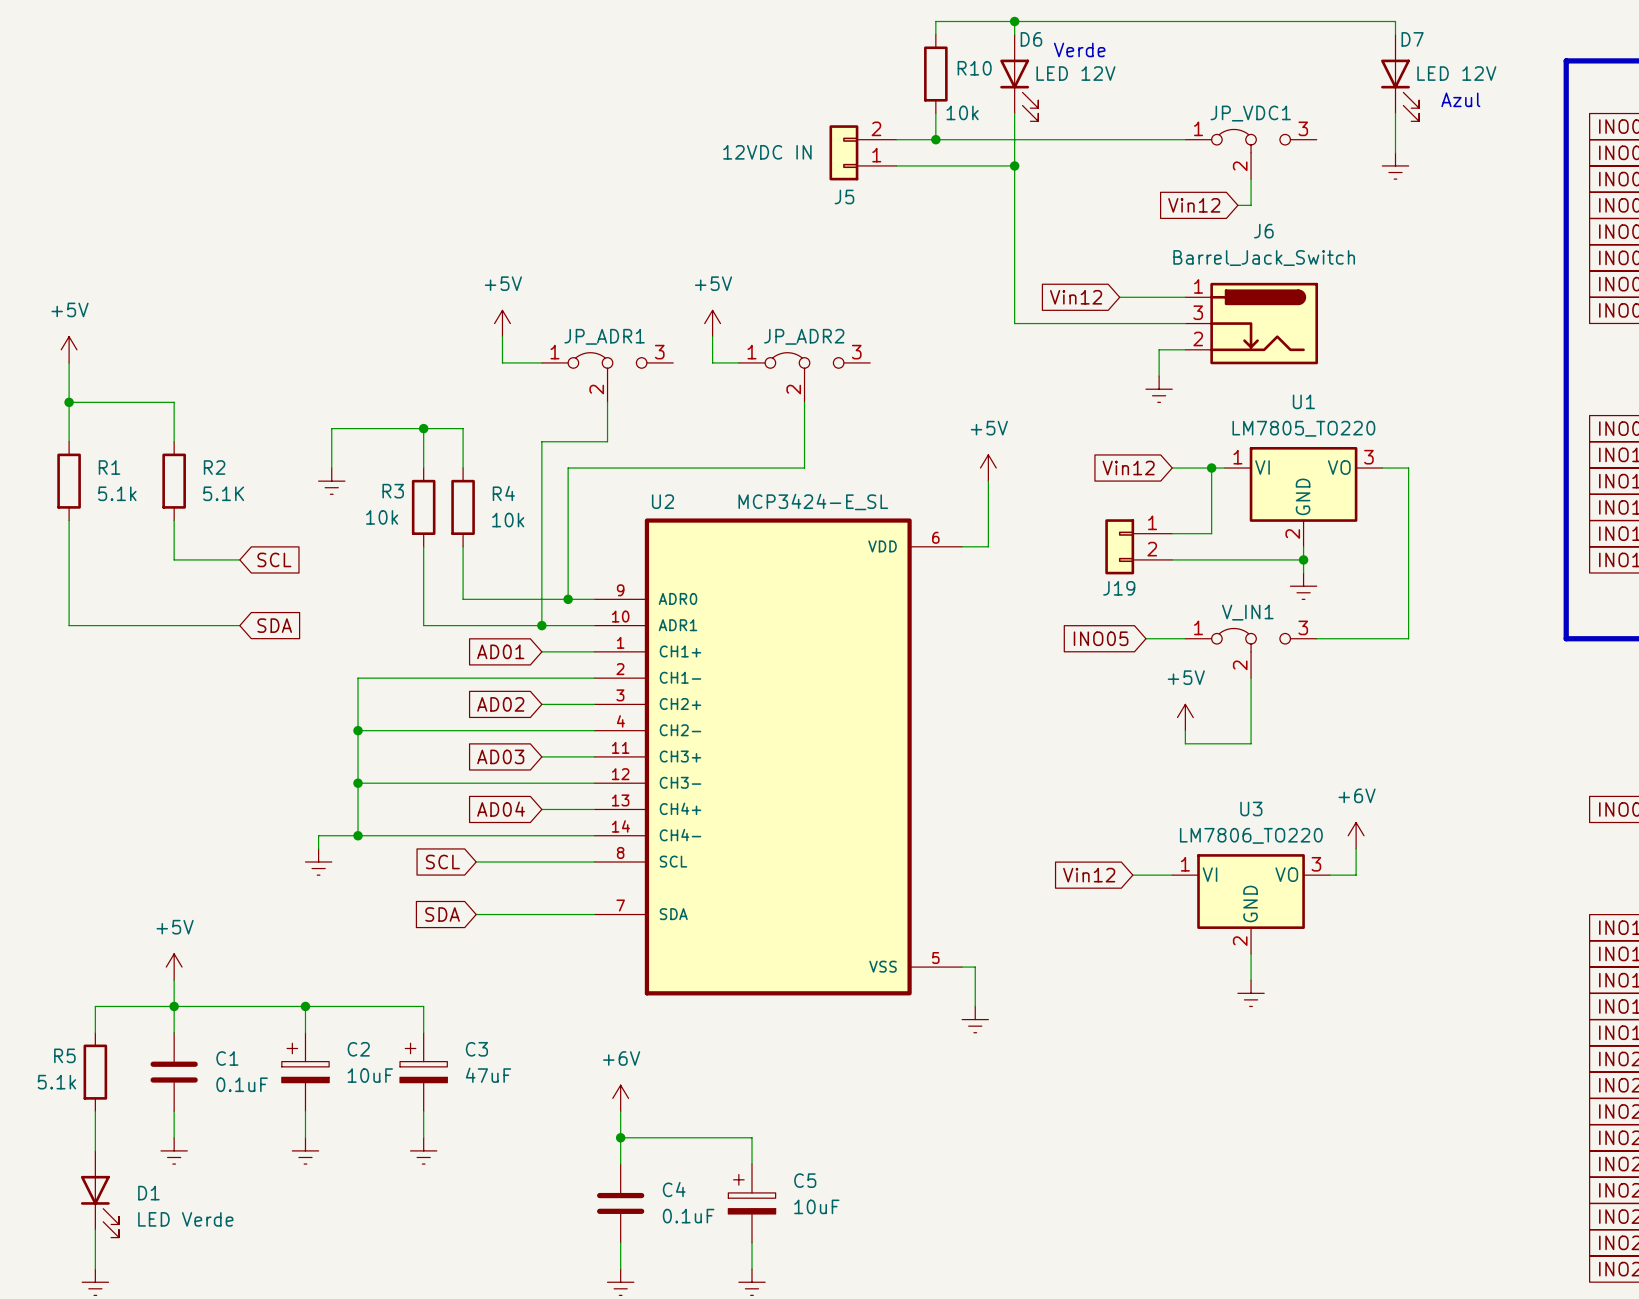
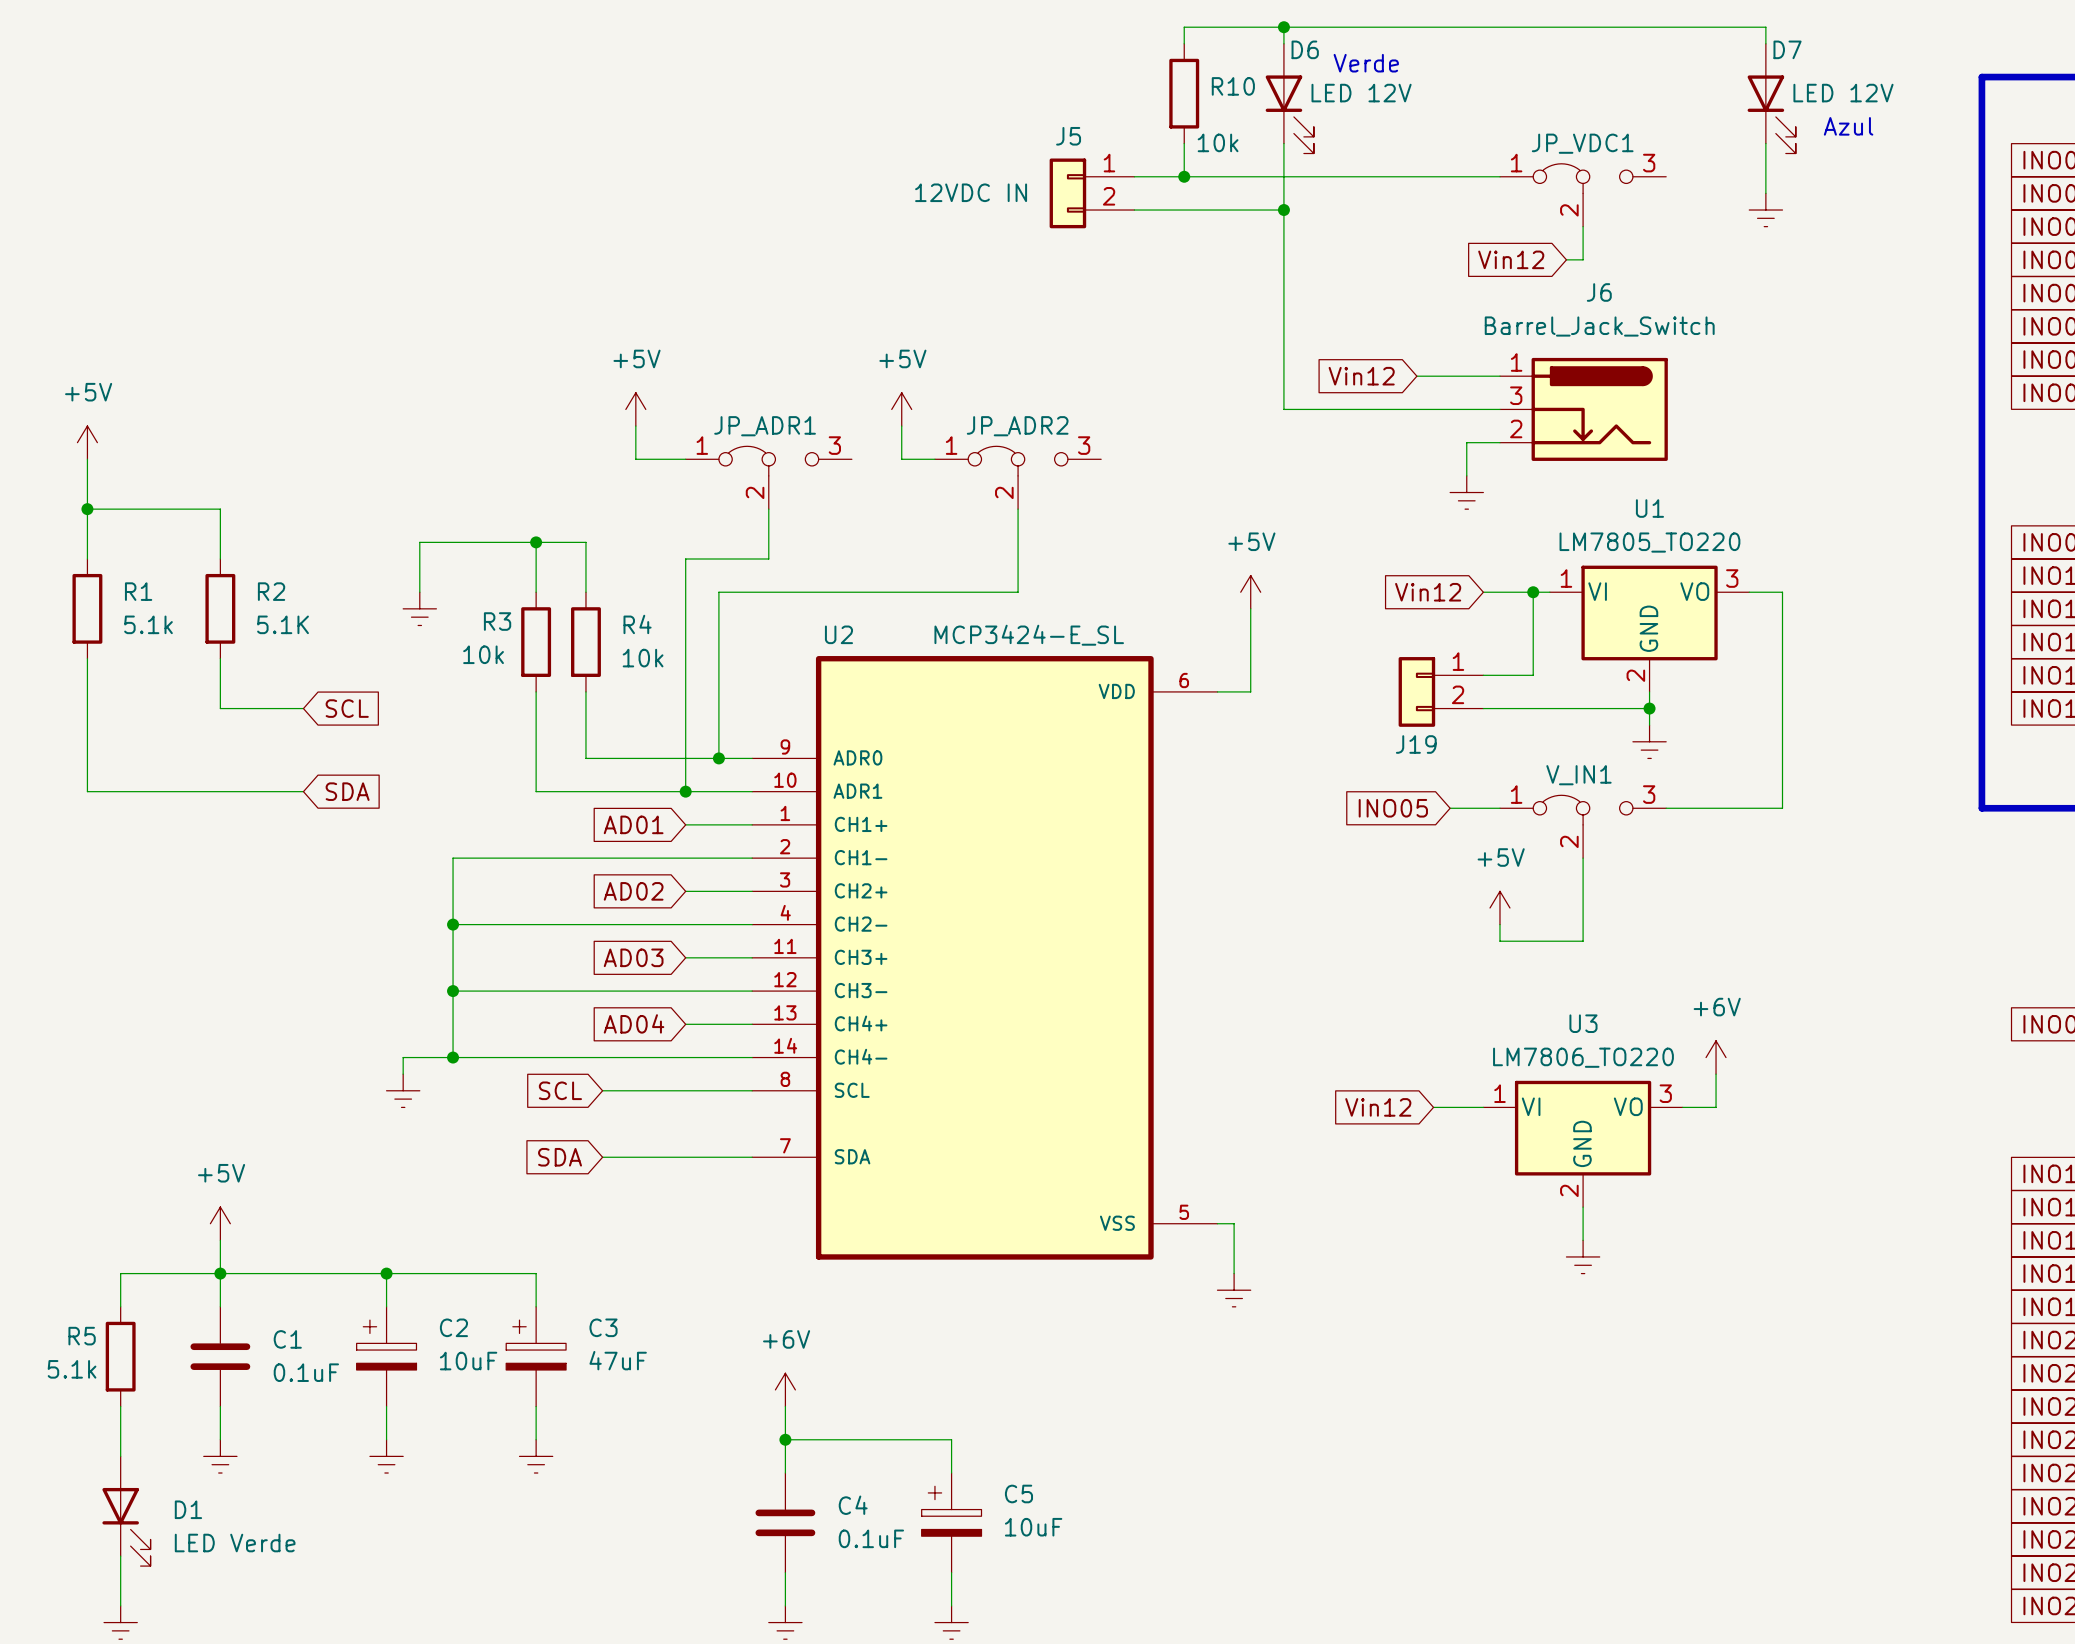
J5 flip: as is (843, 152) -> up-down (1067, 193)

